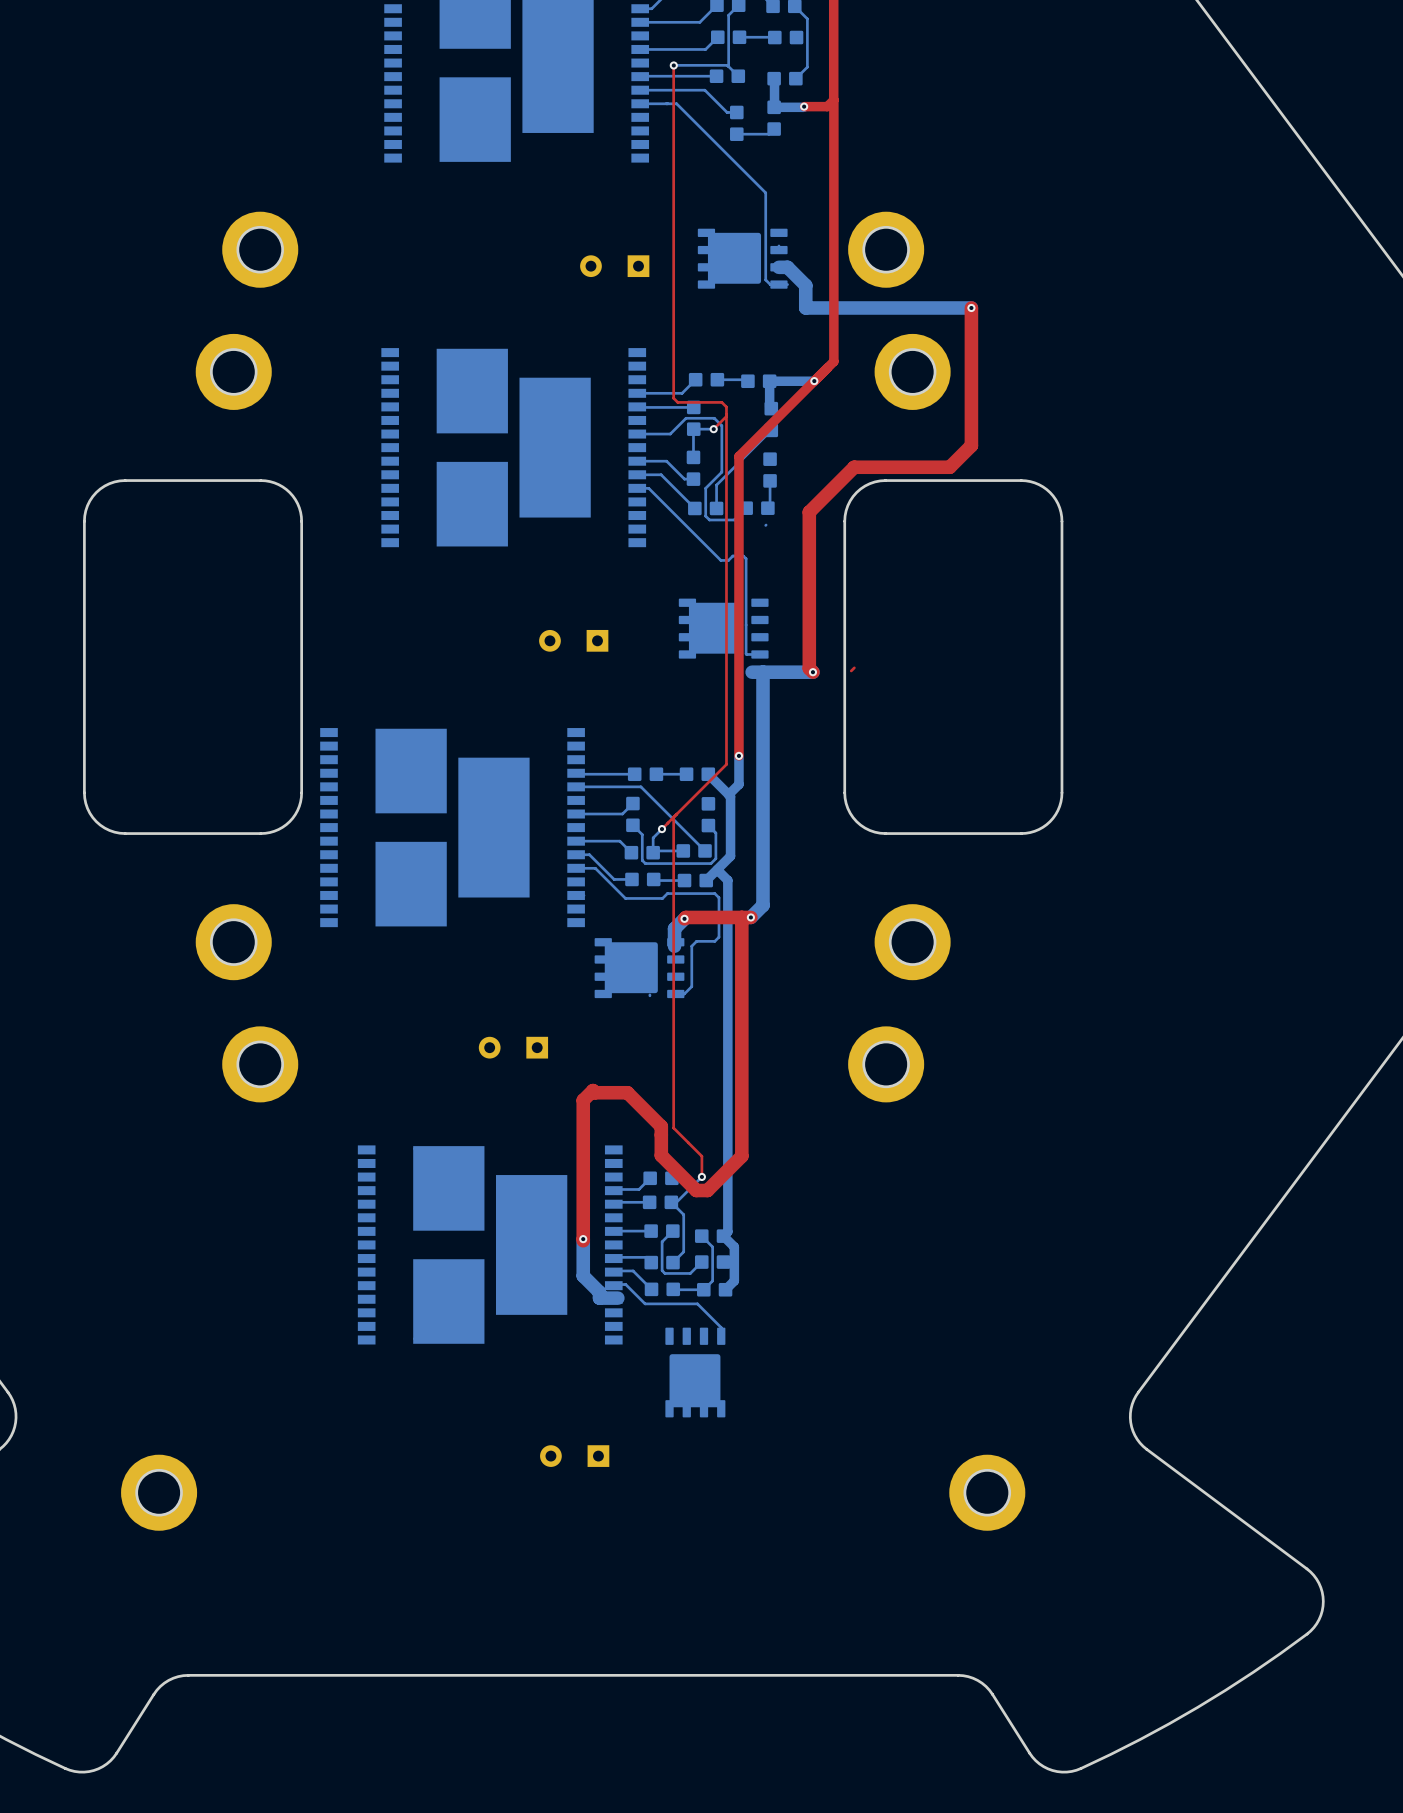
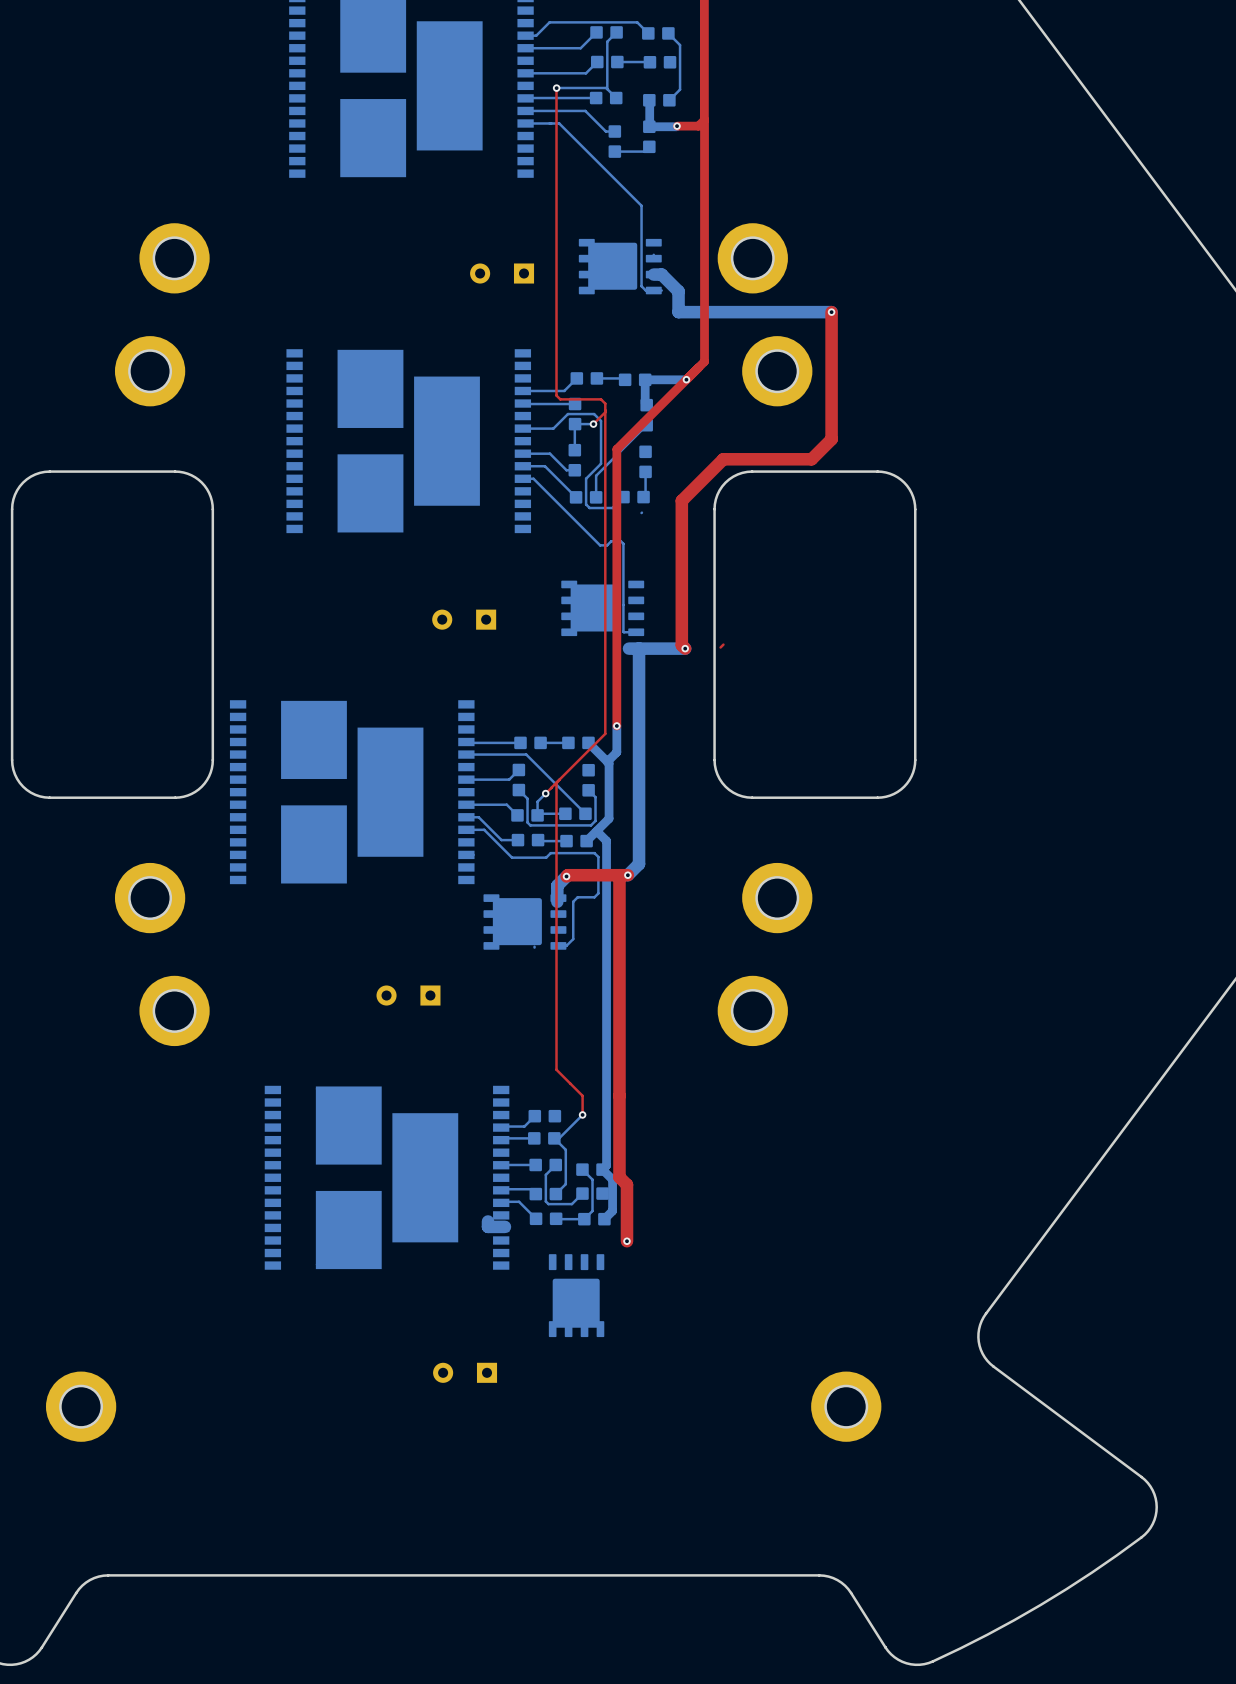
top track: (741, 1156) (707, 1190) (696, 1190) (661, 1155) (661, 1126) (627, 1092) (595, 1092) (593, 1090) (583, 1100) (583, 1240) -> (619, 1095) (619, 1177) (627, 1184) (627, 1241)
bottom track: (583, 1239) (583, 1275) (599, 1292) -> none
via: (583, 1239) -> none
bottom track: (617, 1284) (625, 1284) (645, 1303) (697, 1303) (721, 1327) (721, 1336) -> none
via: none -> (627, 1241)

